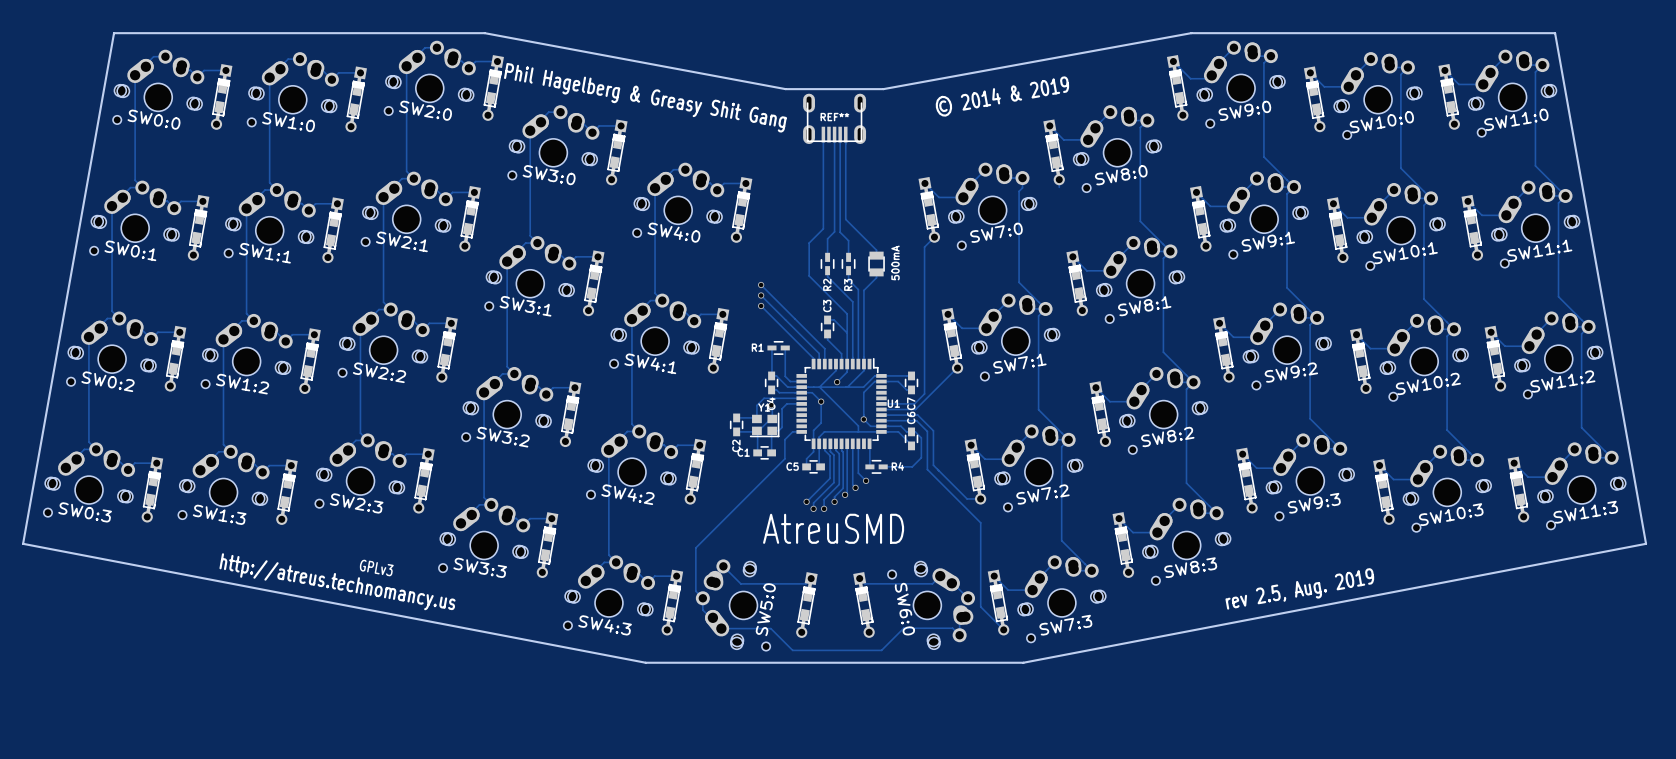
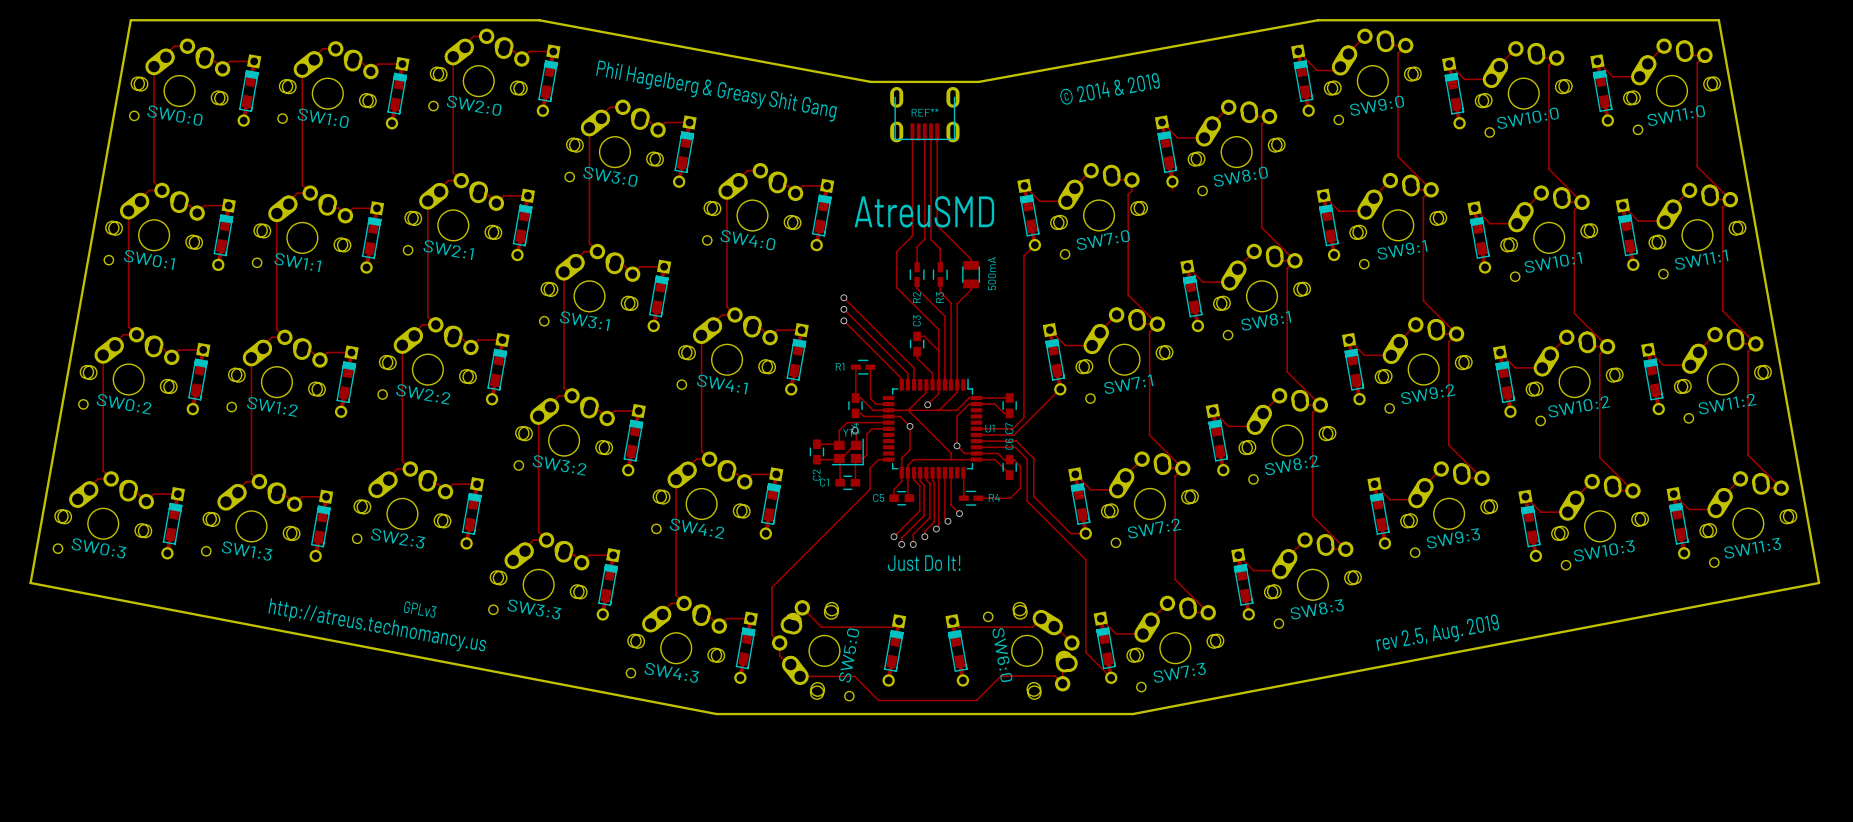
text: none -> AtreuSMD (924, 211)
text: AtreuSMD (833, 528) -> Just Do It! (924, 563)

